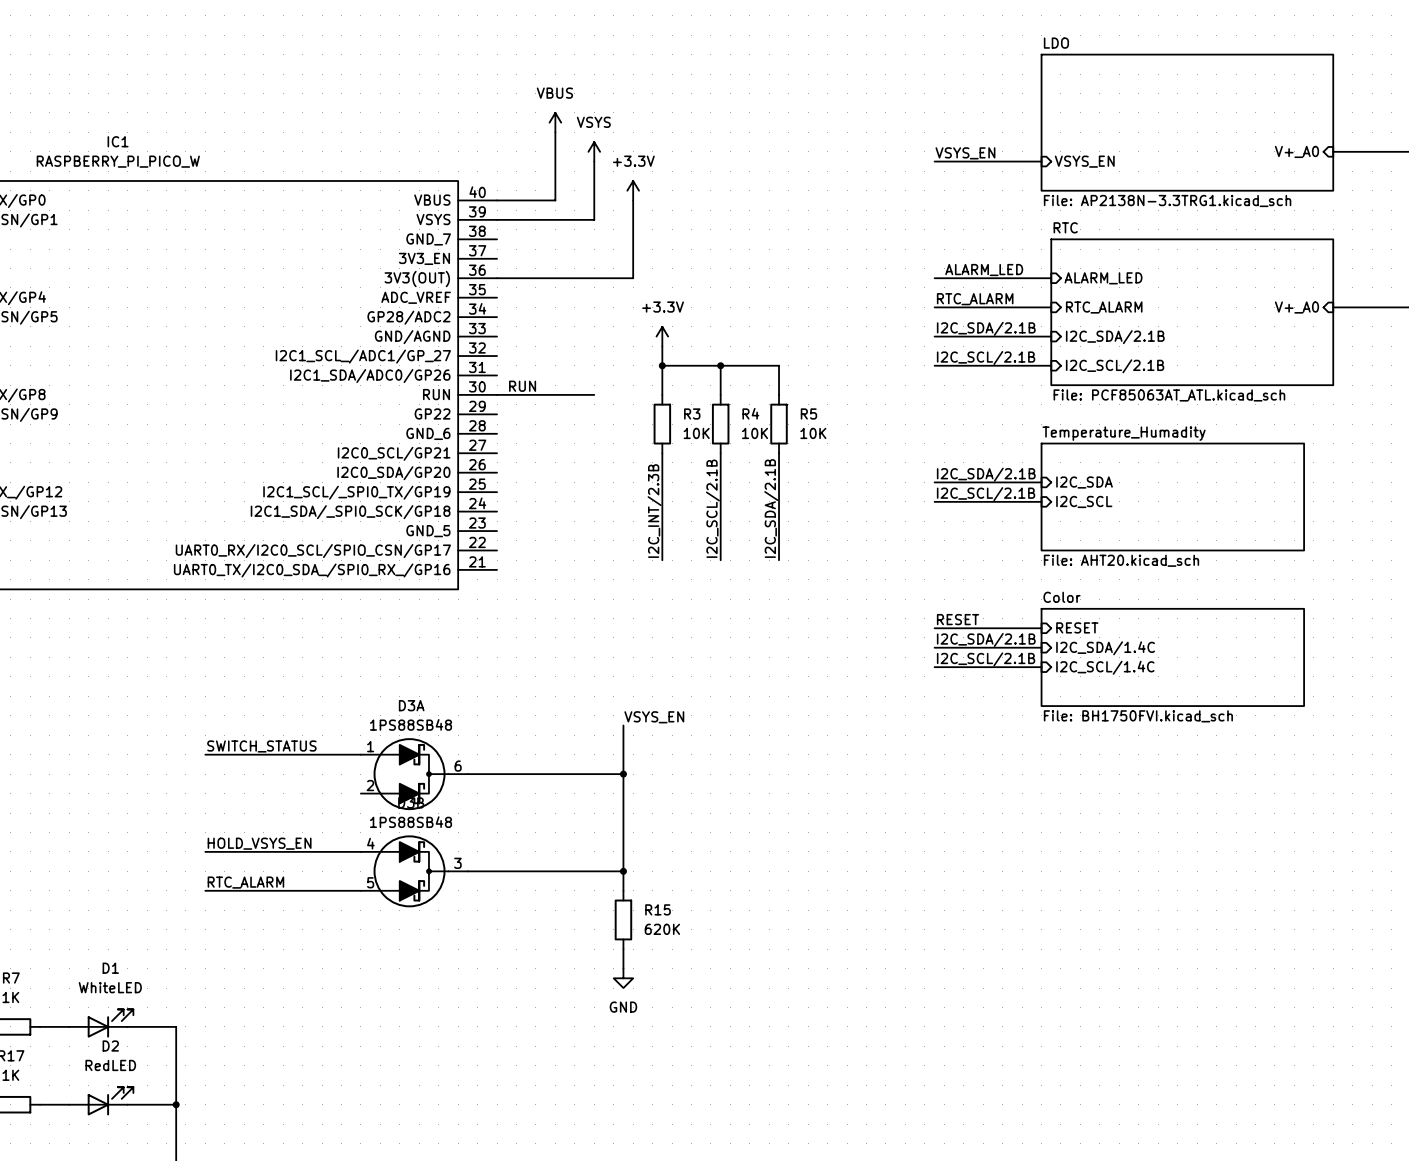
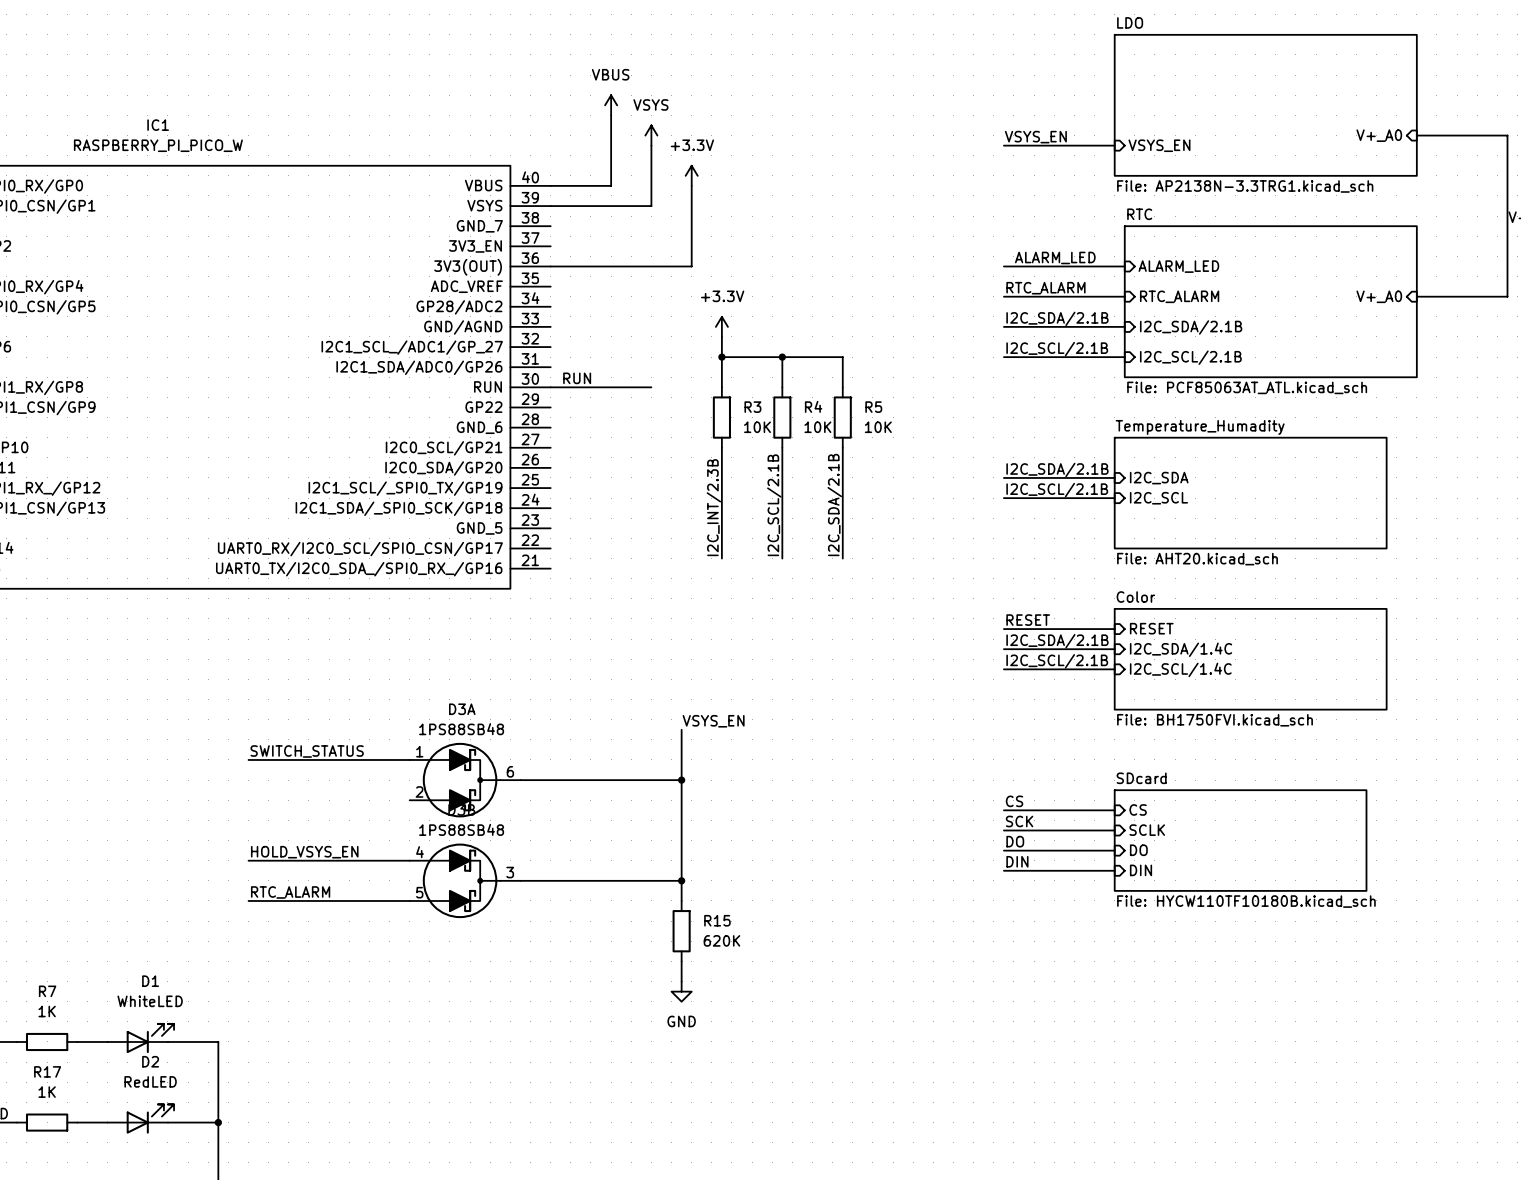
label: none -> CS (1014, 801)
sheet pin: none -> CS (1138, 809)
wire: none -> (1003, 810) (1114, 810)
label: none -> SCK (1019, 821)
wire: none -> (1003, 830) (1114, 830)
sheet pin: none -> SCLK (1147, 830)
sheet SDcard: none -> File: HYCW110TF10180B.kicad_sch (1240, 840)
label: none -> DO (1015, 841)
sheet pin: none -> DO (1138, 850)
wire: none -> (1003, 850) (1114, 850)
label: none -> DIN (1017, 861)
wire: none -> (1003, 870) (1114, 870)
sheet pin: none -> DIN (1141, 870)

